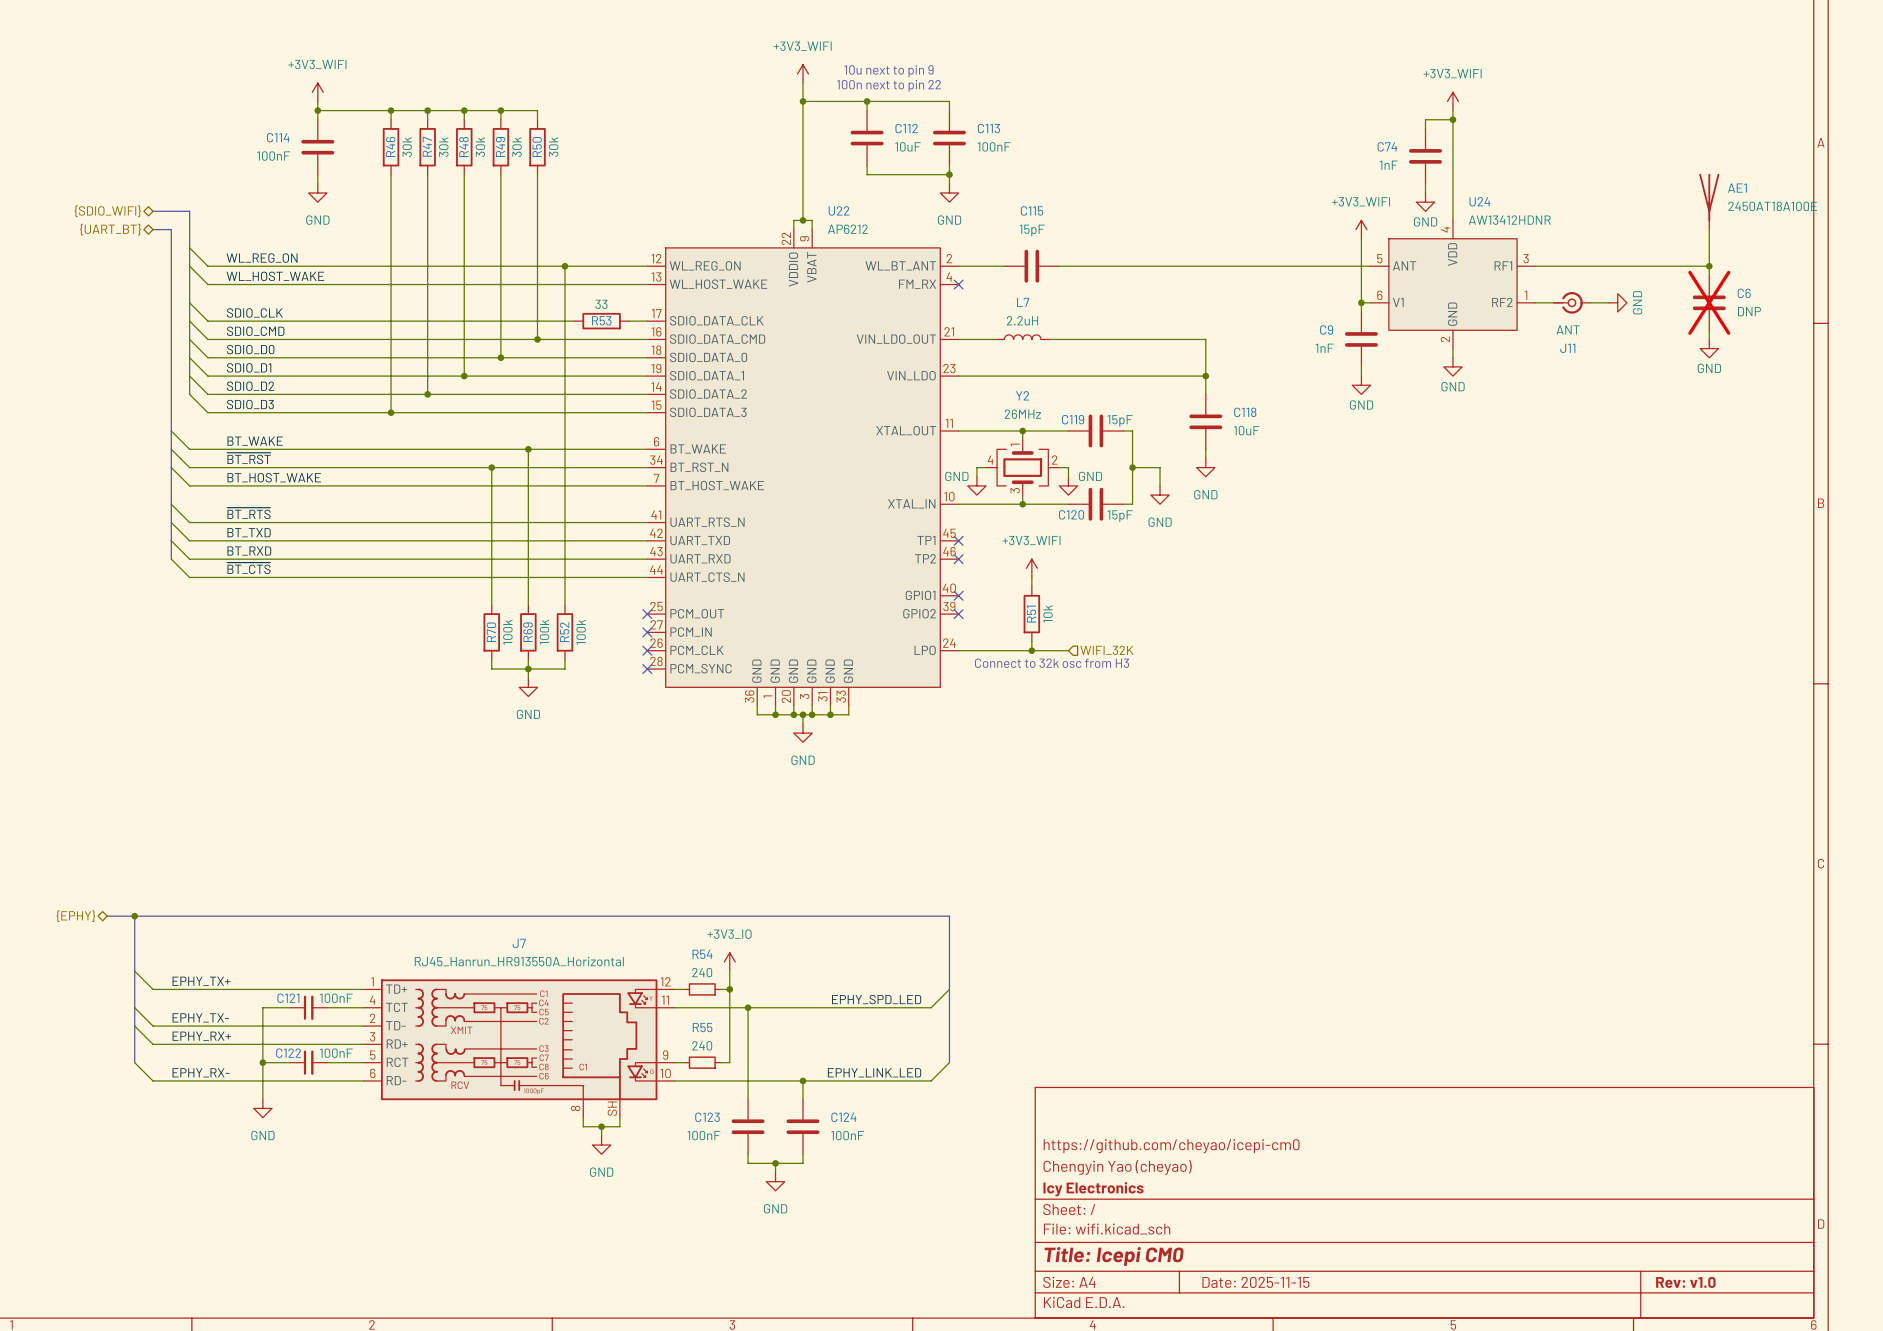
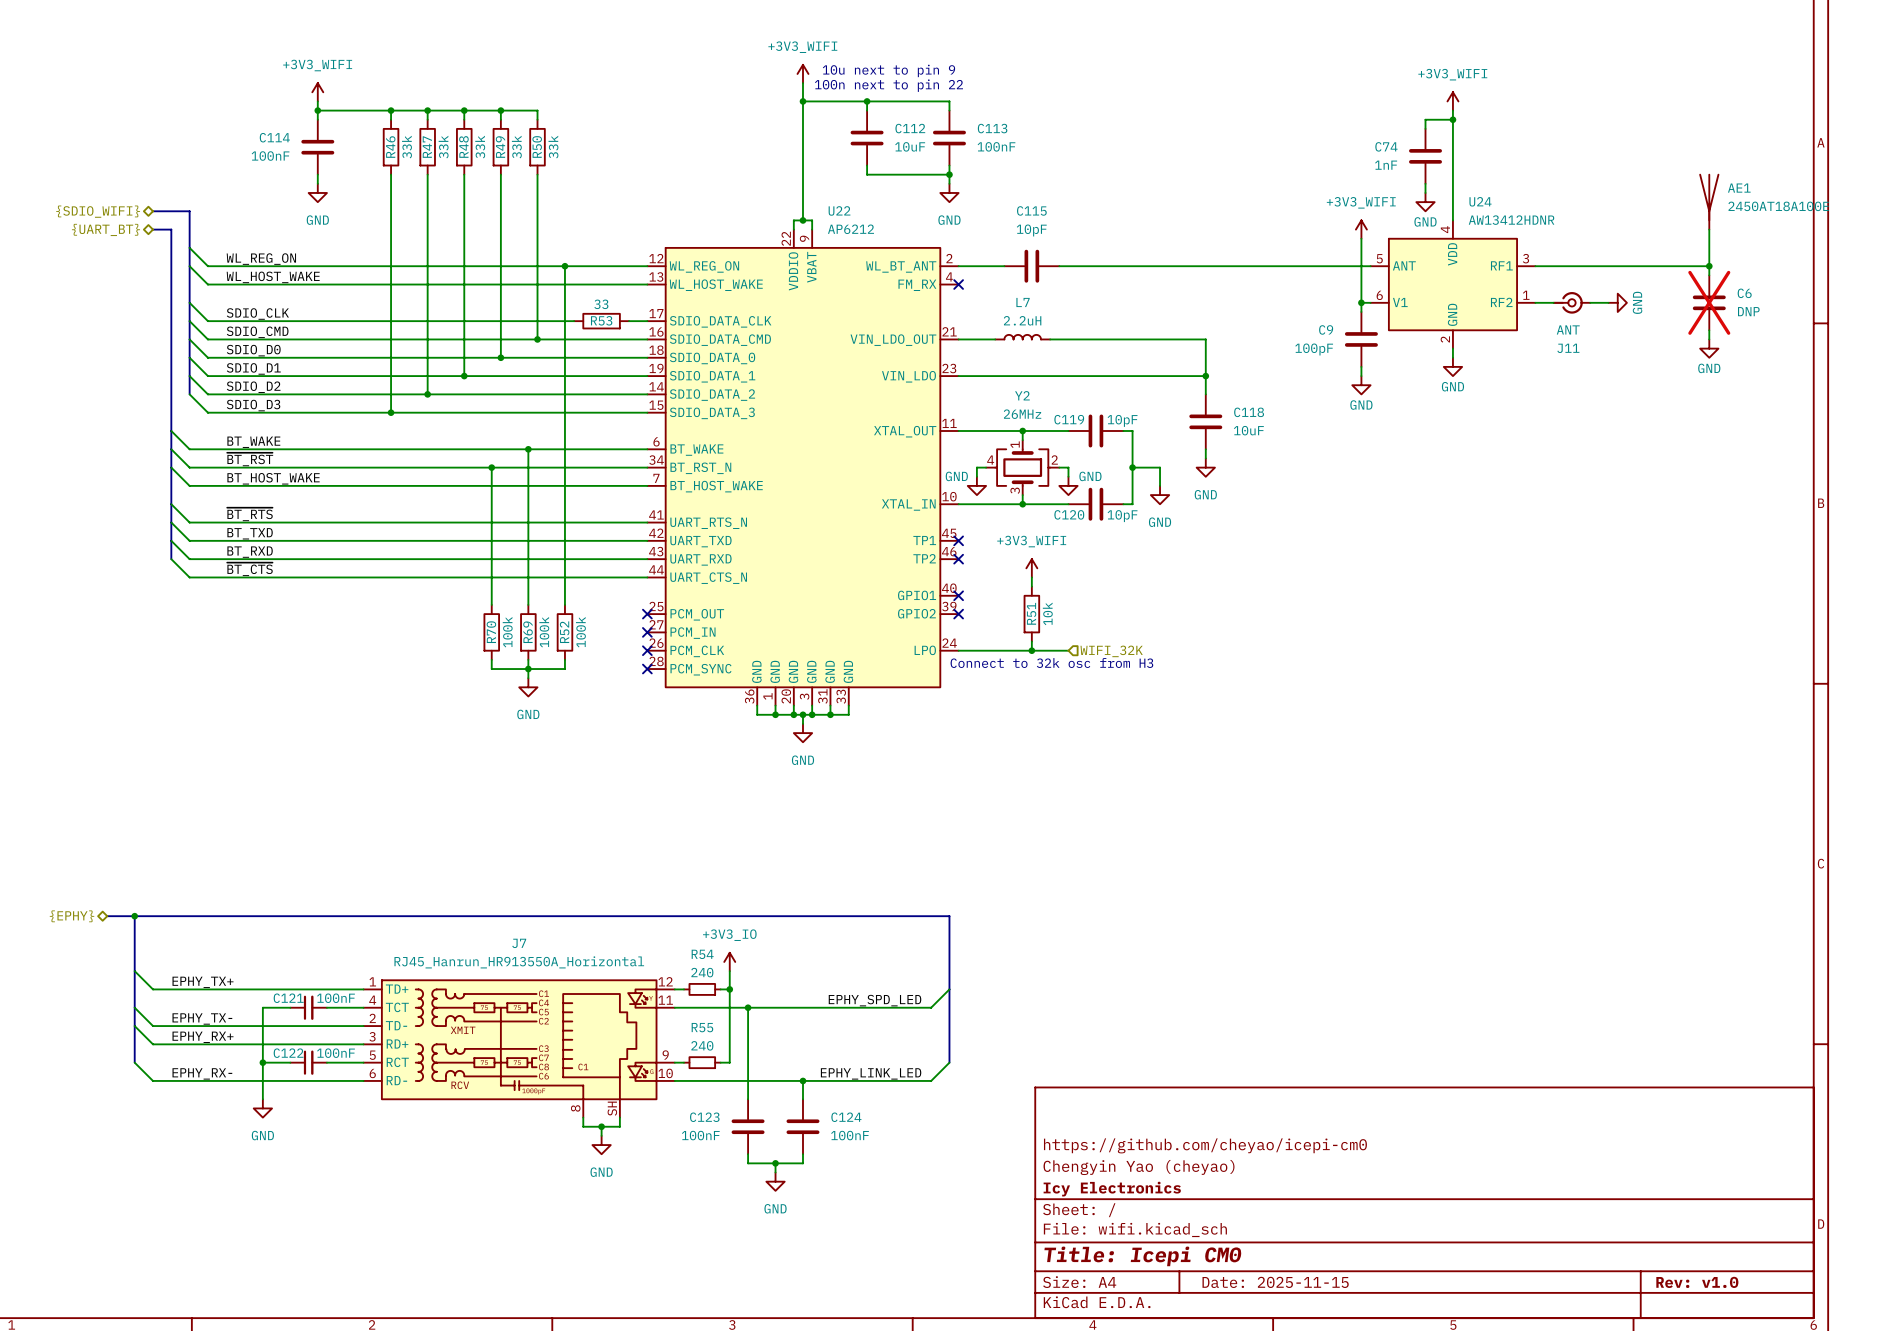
R46 value: 30k (407, 147) -> 33k (406, 147)
R47 value: 30k (443, 147) -> 33k (443, 147)
R48 value: 30k (480, 147) -> 33k (480, 147)
R49 value: 30k (517, 147) -> 33k (516, 147)
R50 value: 30k (553, 147) -> 33k (553, 147)
C115 value: 15pF (1032, 230) -> 10pF (1031, 230)
C9 value: 1nF (1324, 348) -> 100pF (1314, 349)
C119 value: 15pF (1120, 420) -> 10pF (1122, 420)
C120 value: 15pF (1120, 516) -> 10pF (1122, 516)

